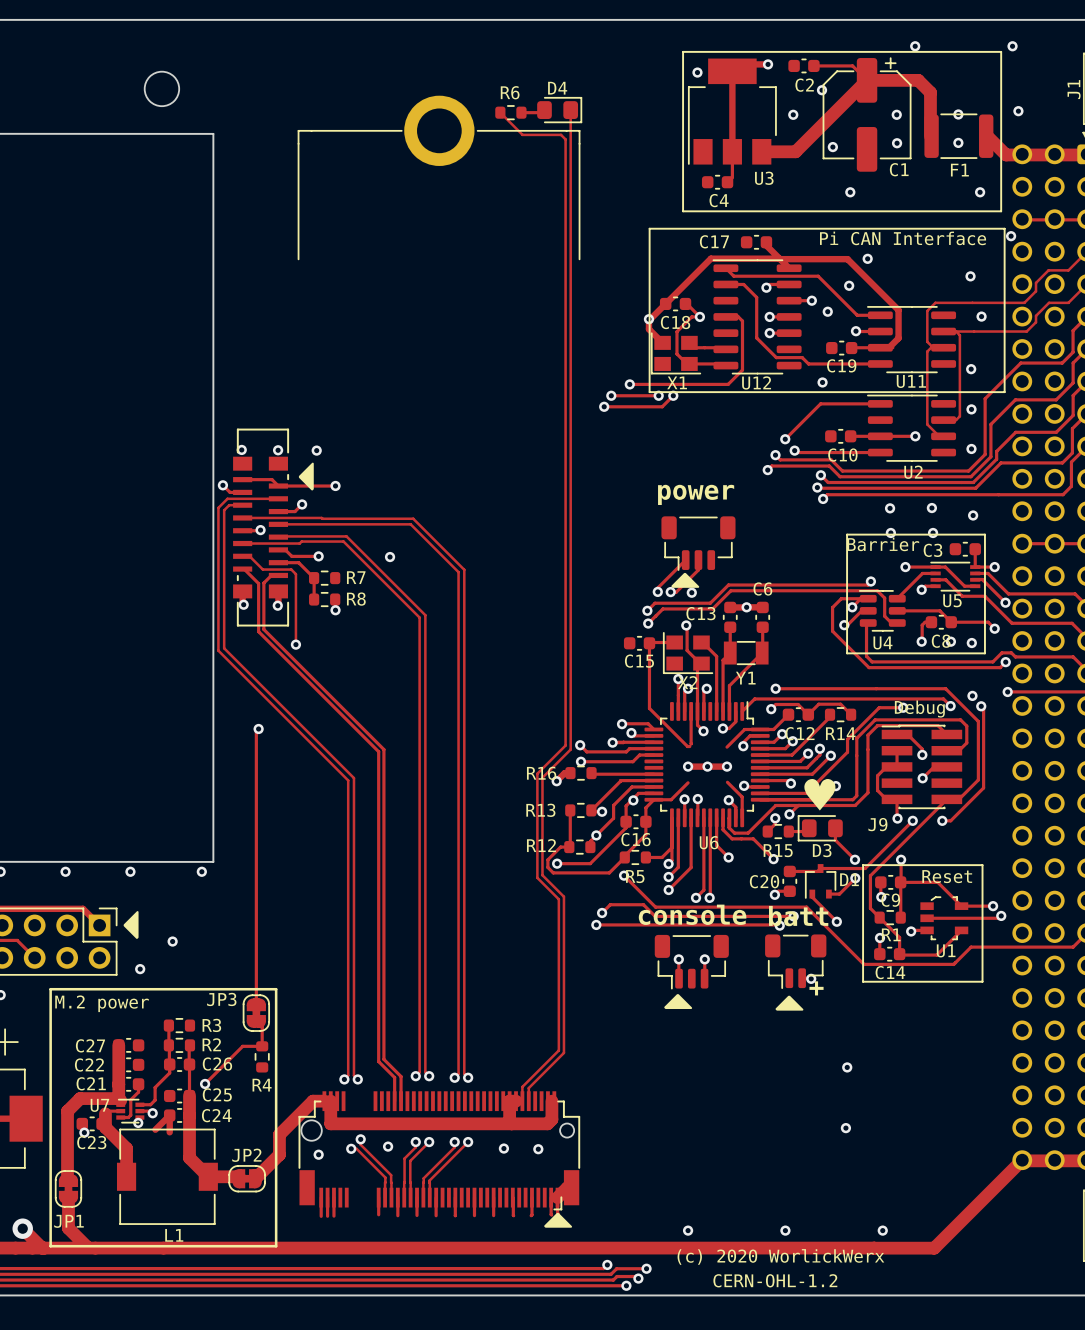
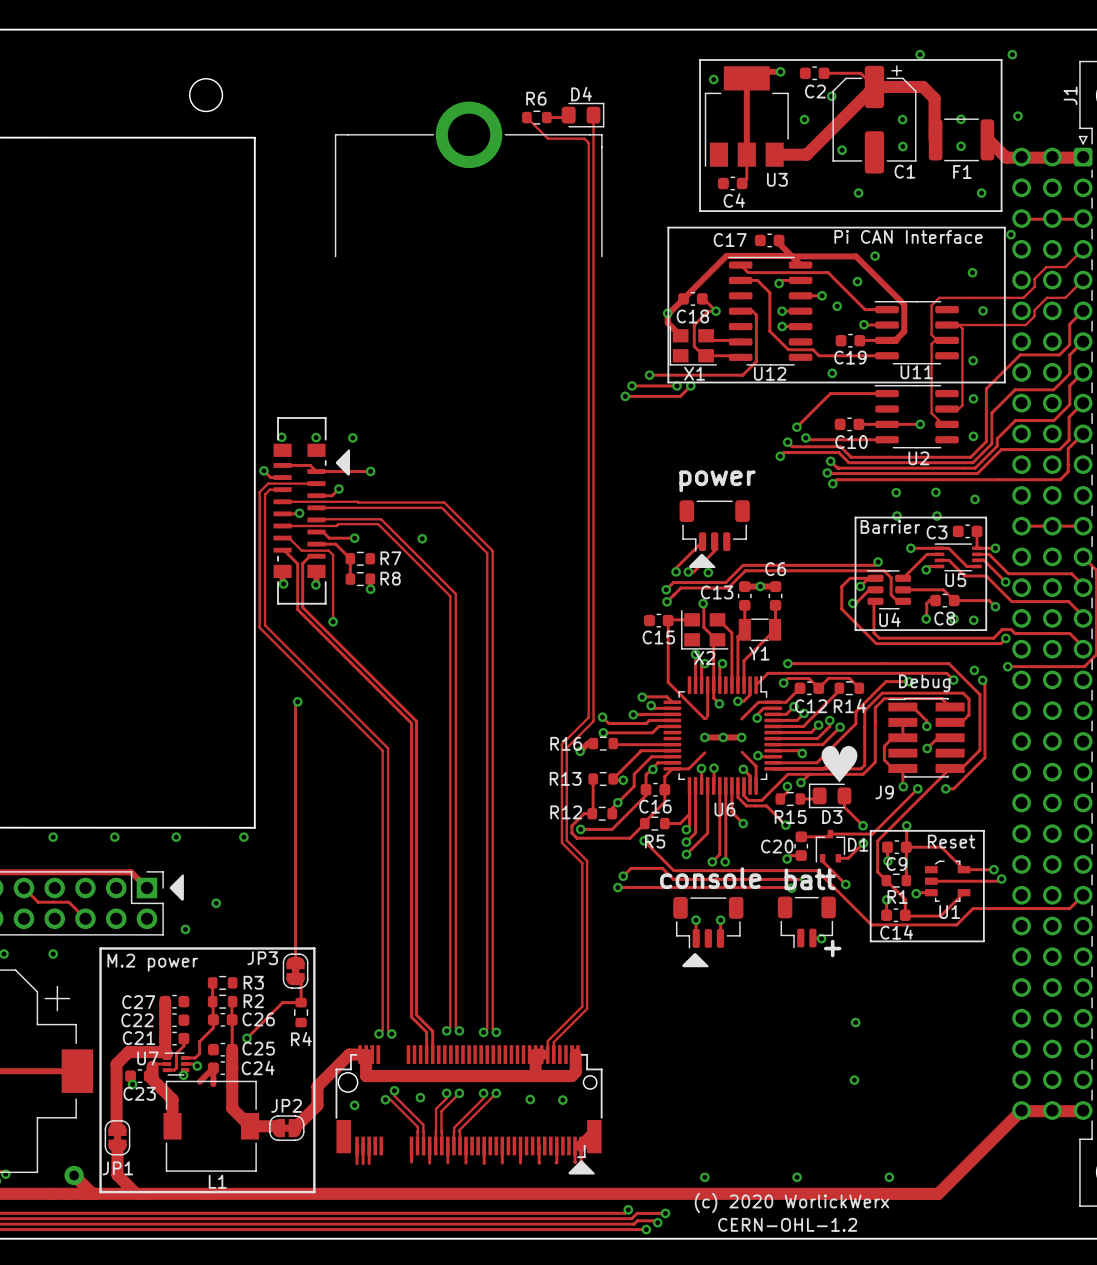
drawing: [775, 995, 804, 1011] -> none

